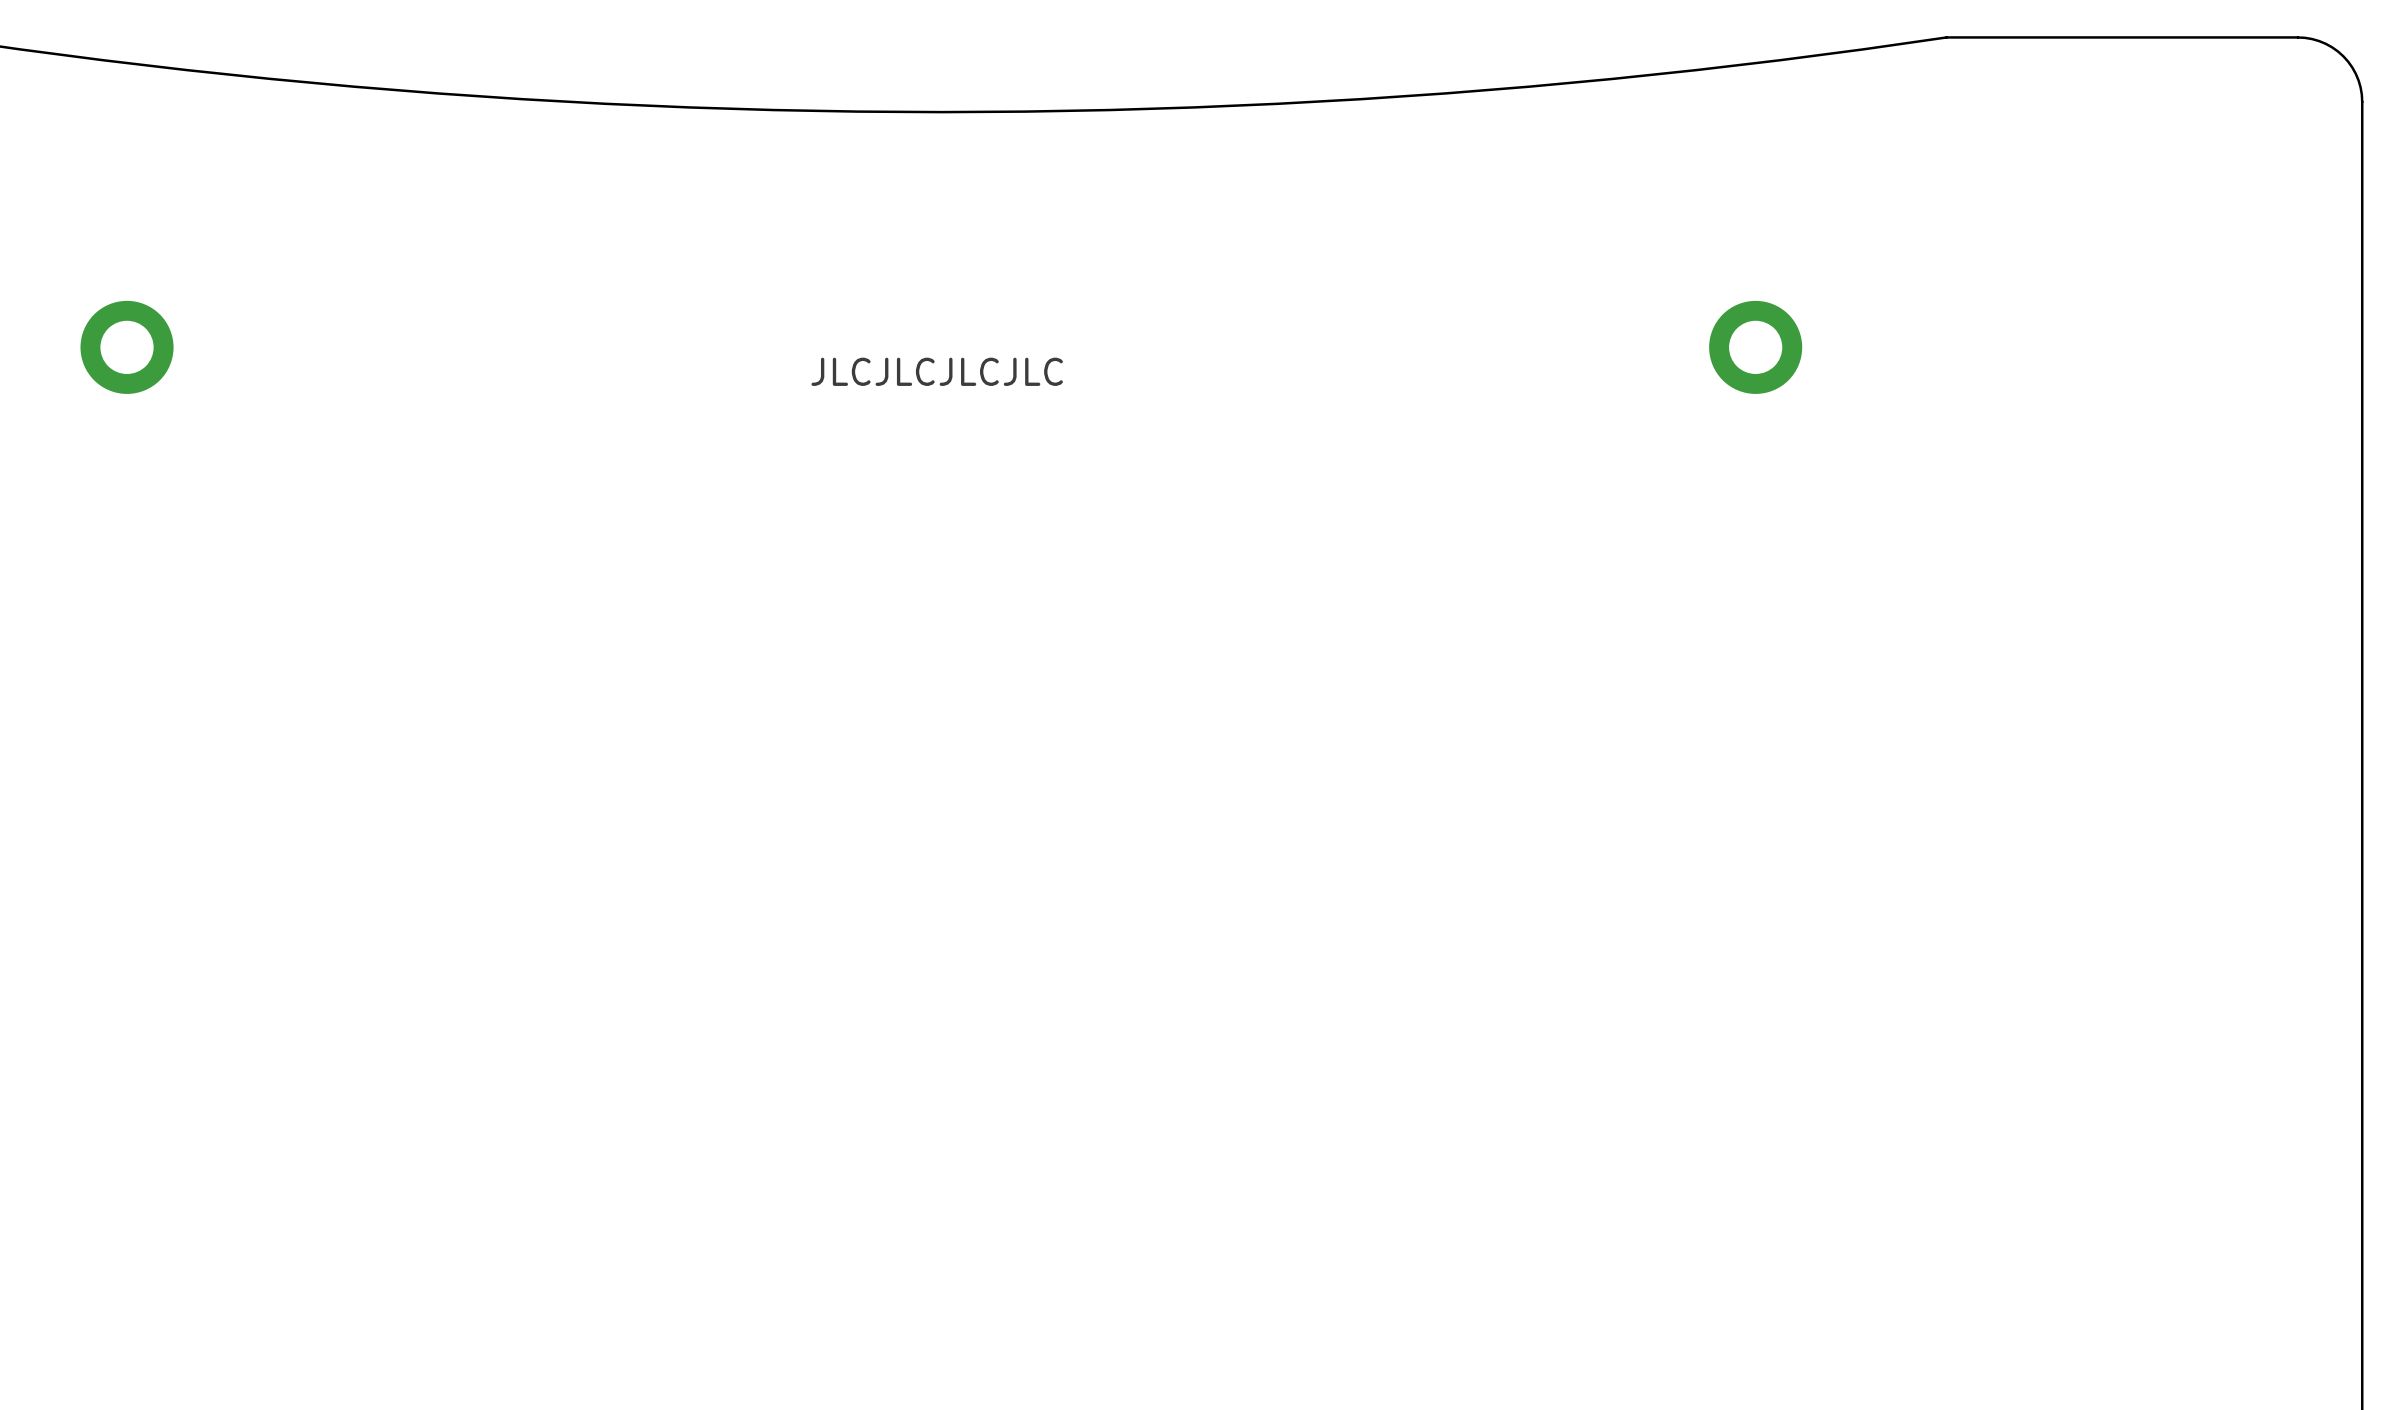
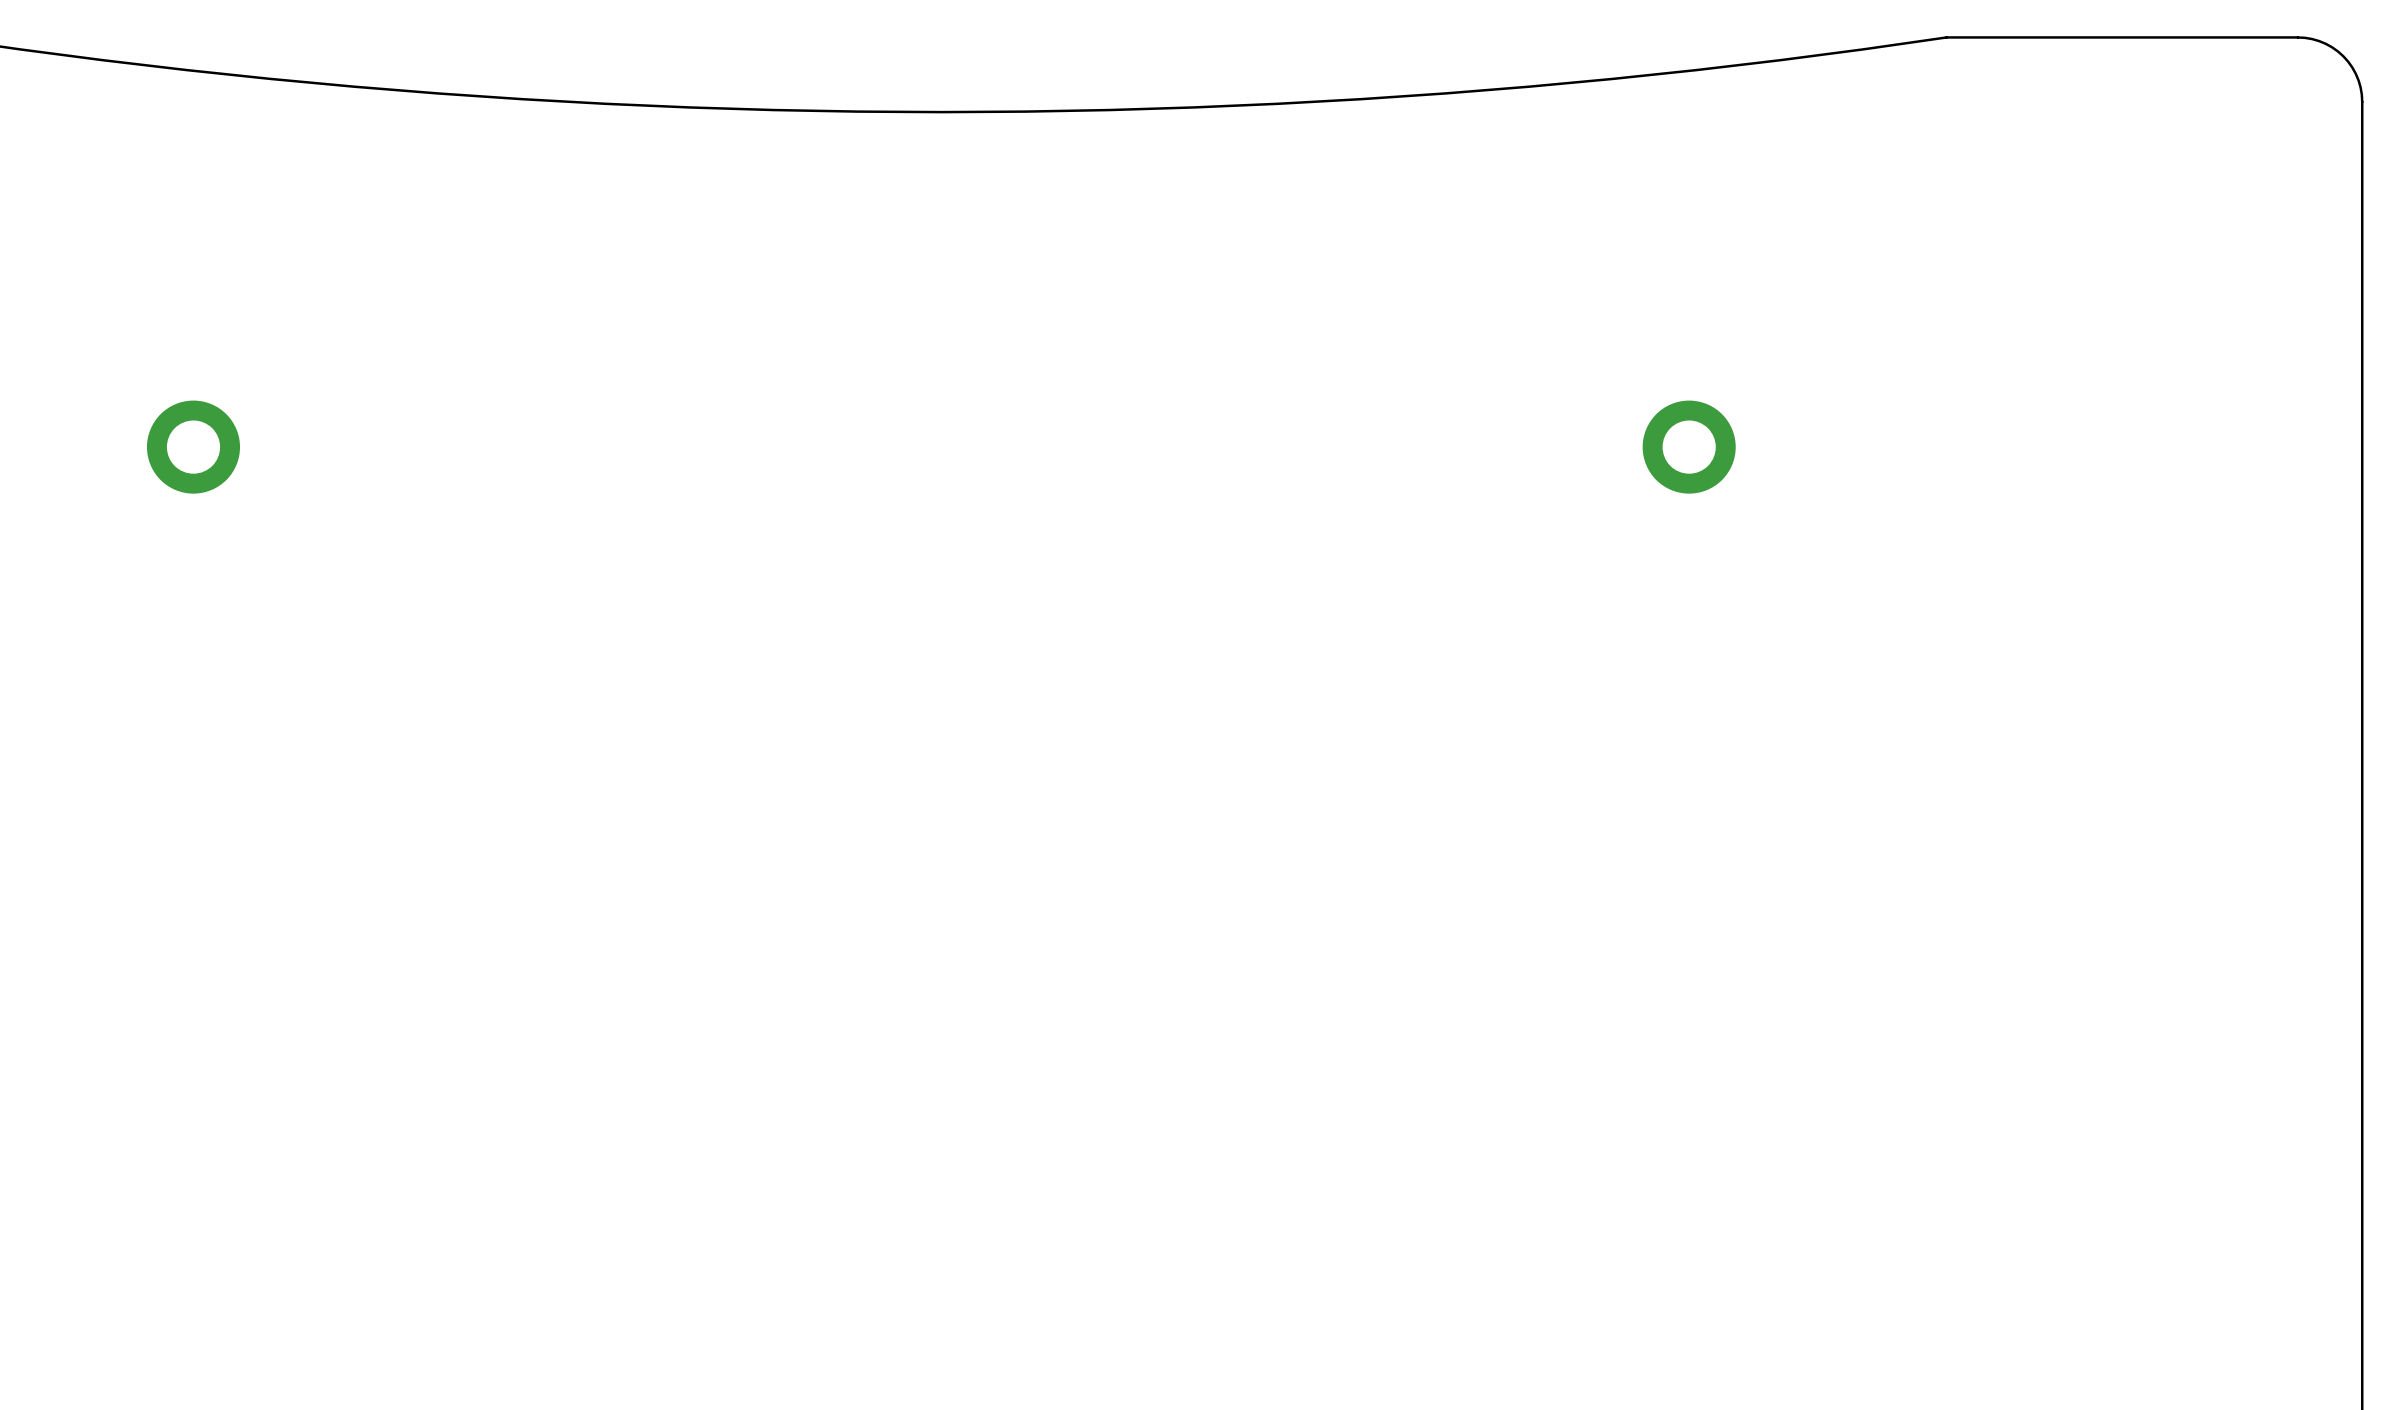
part position: (127, 347) -> (193, 447)
part position: (1755, 347) -> (1689, 447)
text: JLCJLCJLCJLC (937, 371) -> none

